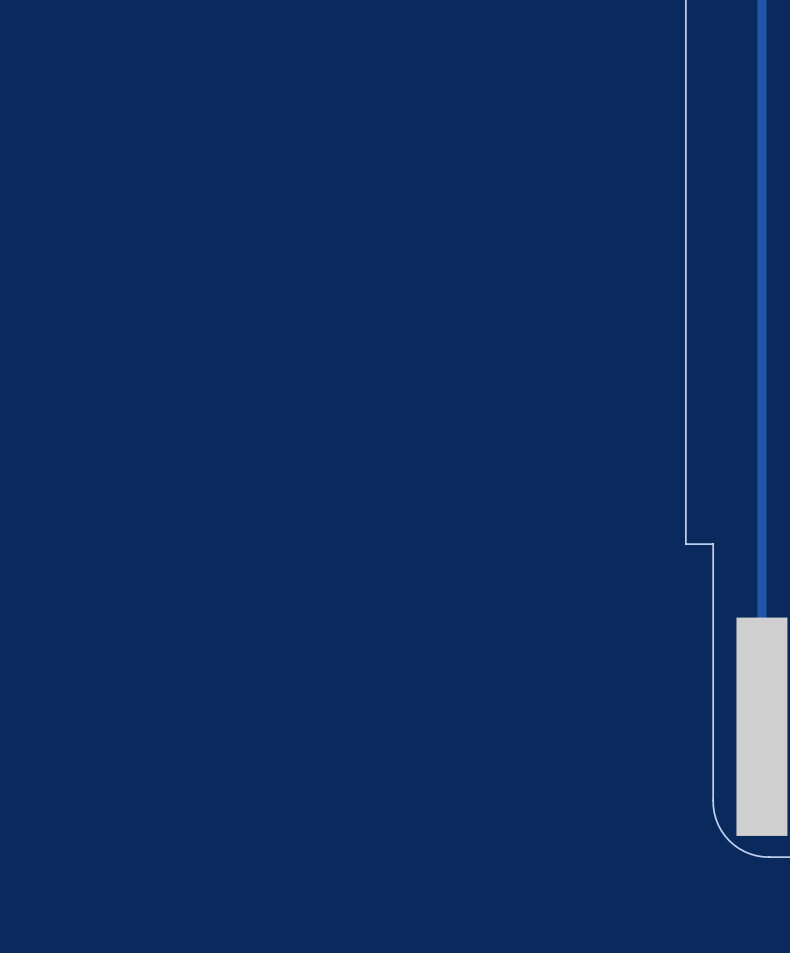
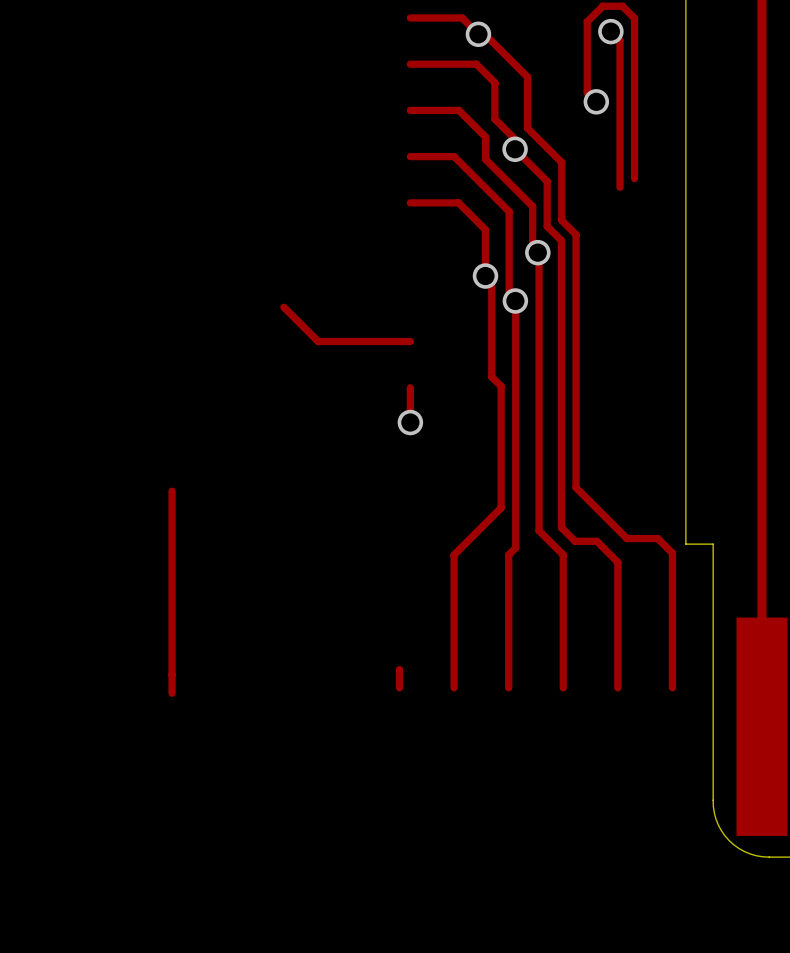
track: none -> (410, 17) (462, 17) (478, 34) (484, 34) (527, 77) (527, 128) (561, 162) (561, 220) (576, 234) (576, 487) (626, 538) (657, 538) (672, 553) (672, 687)
track: none -> (610, 31) (619, 40) (619, 187)
via: none -> (610, 31)
via: none -> (478, 34)
track: none -> (410, 64) (476, 64) (494, 82) (494, 119) (515, 139) (515, 149) (547, 181) (547, 226) (561, 240) (561, 527) (575, 541) (596, 541) (617, 562) (617, 687)
track: none -> (596, 101) (587, 92) (587, 21) (602, 6) (622, 6) (634, 18) (634, 178)
via: none -> (596, 101)
track: none -> (410, 110) (458, 110) (485, 137) (485, 159) (532, 206) (532, 247) (539, 253) (539, 530) (563, 554) (563, 687)
via: none -> (515, 149)
track: none -> (410, 156) (454, 156) (509, 211) (509, 294) (515, 301) (515, 547) (508, 554) (508, 687)
track: none -> (410, 202) (458, 202) (485, 229) (485, 276) (491, 282) (491, 376) (501, 386) (501, 507) (454, 554) (454, 687)
via: none -> (537, 252)
via: none -> (485, 276)
via: none -> (515, 301)
track: none -> (283, 307) (318, 341) (410, 341)
track: none -> (410, 387) (410, 422)
via: none -> (410, 422)
track: none -> (172, 491) (172, 693)
track: none -> (399, 669) (399, 687)

